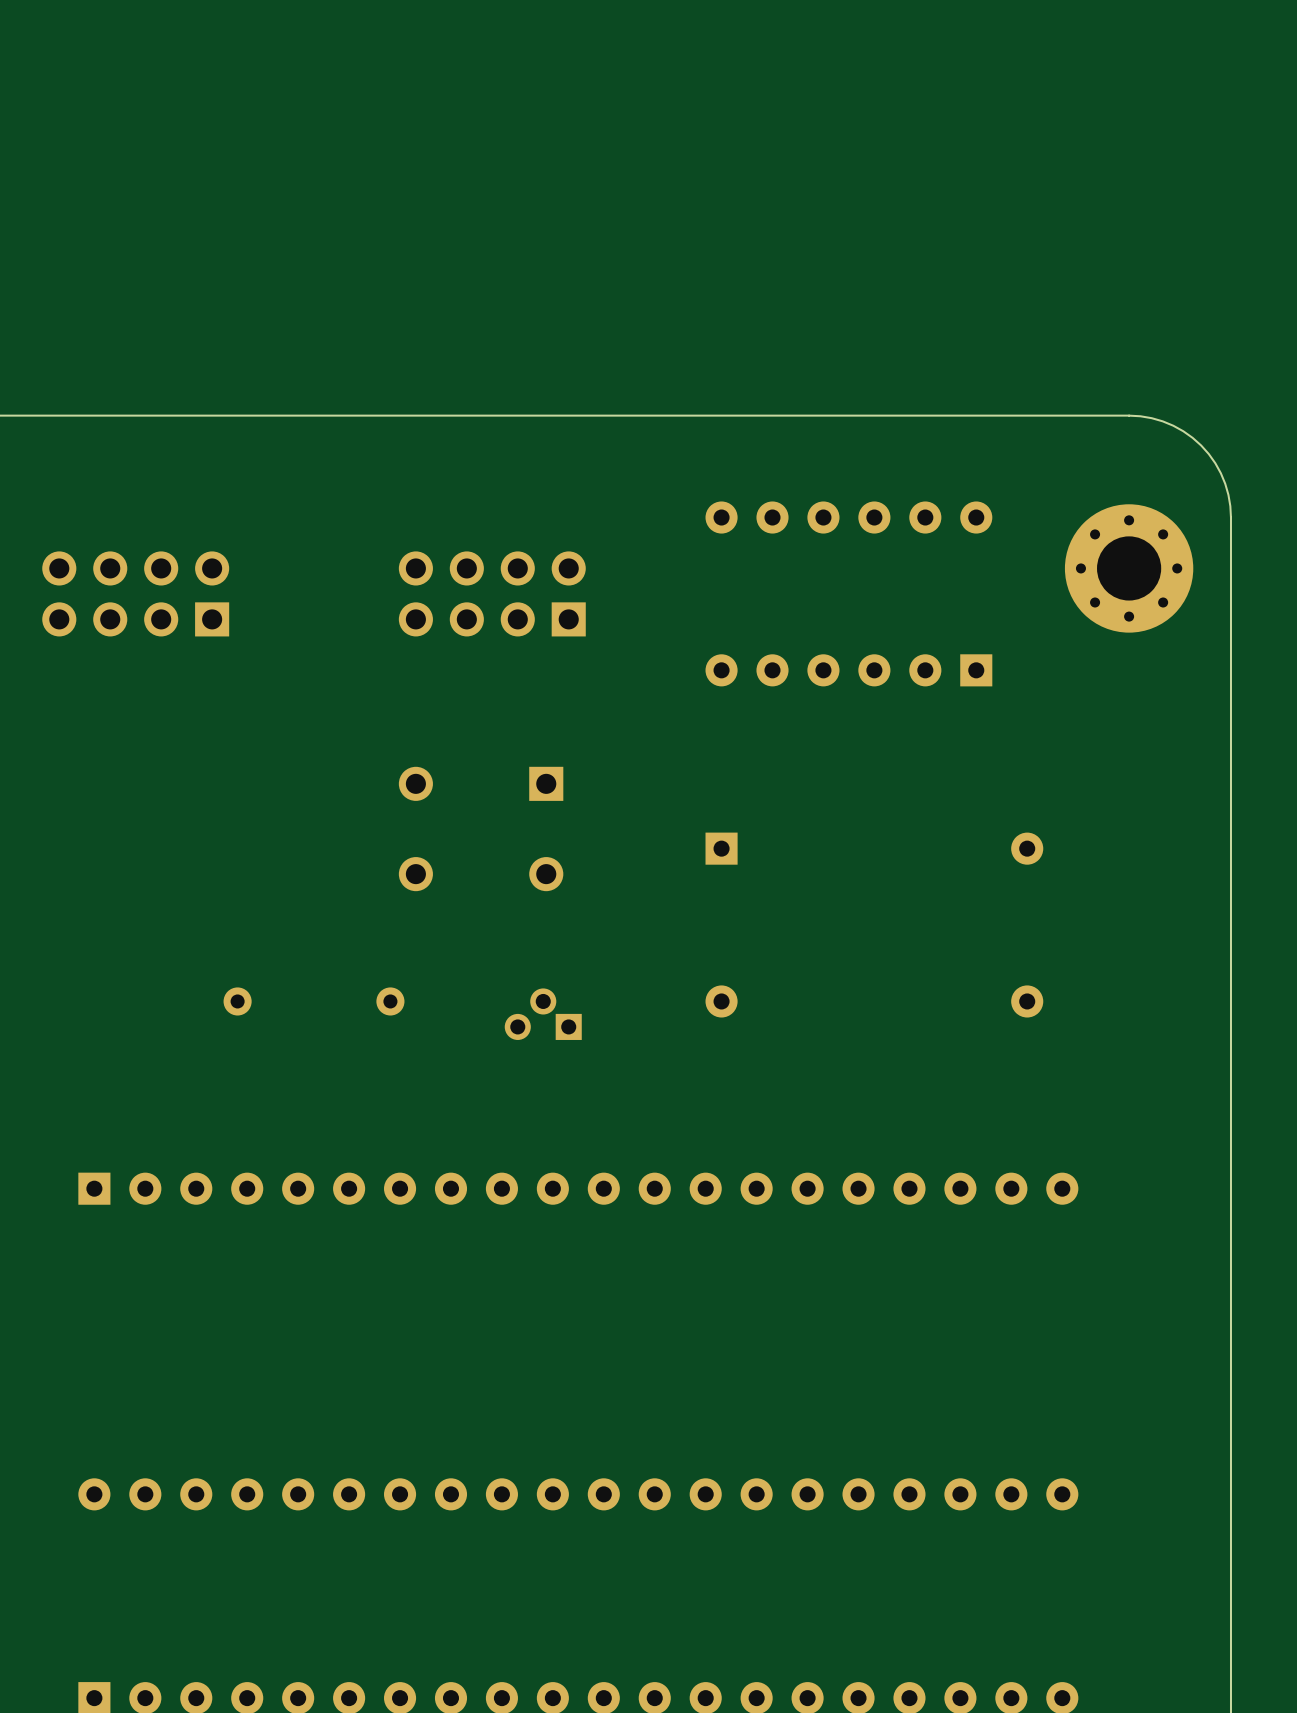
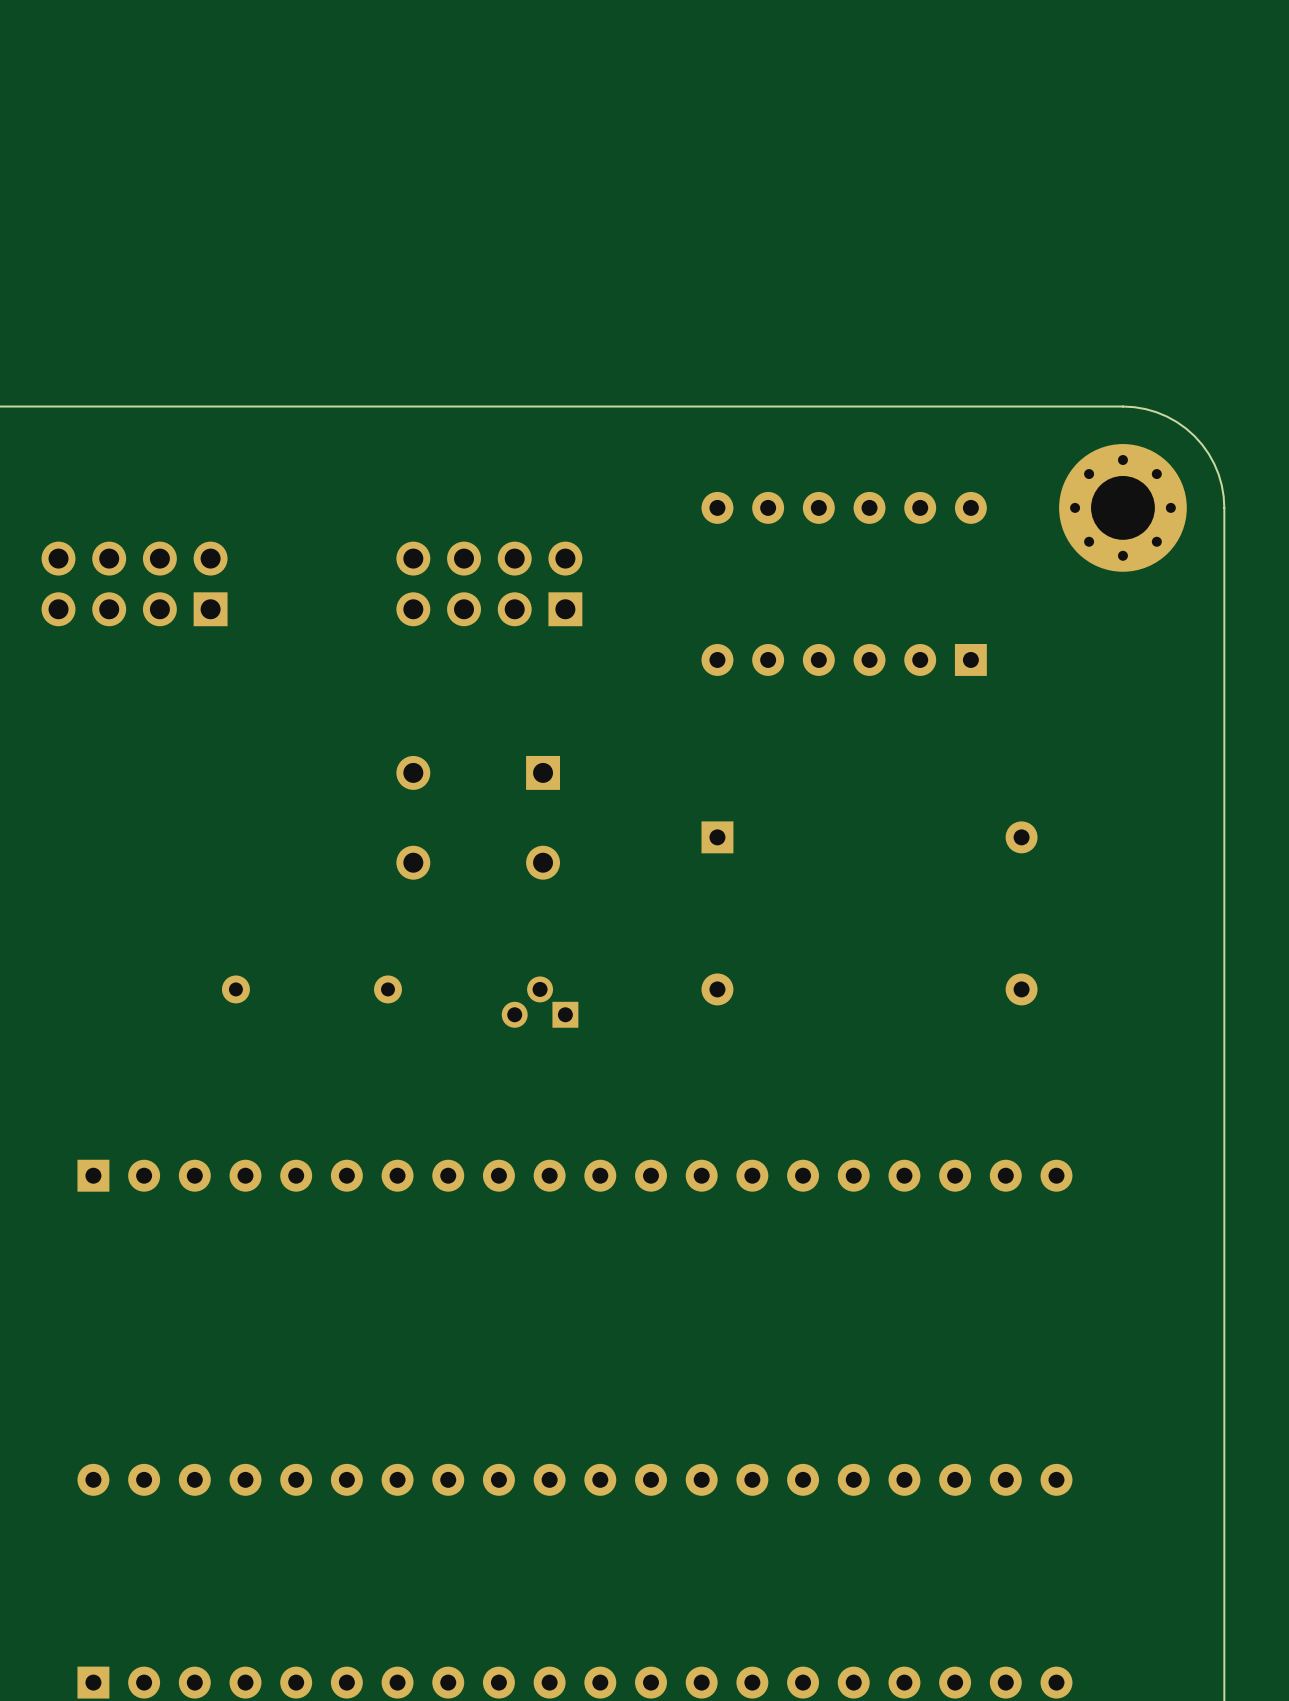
part position: (1129, 568) -> (1122, 507)

